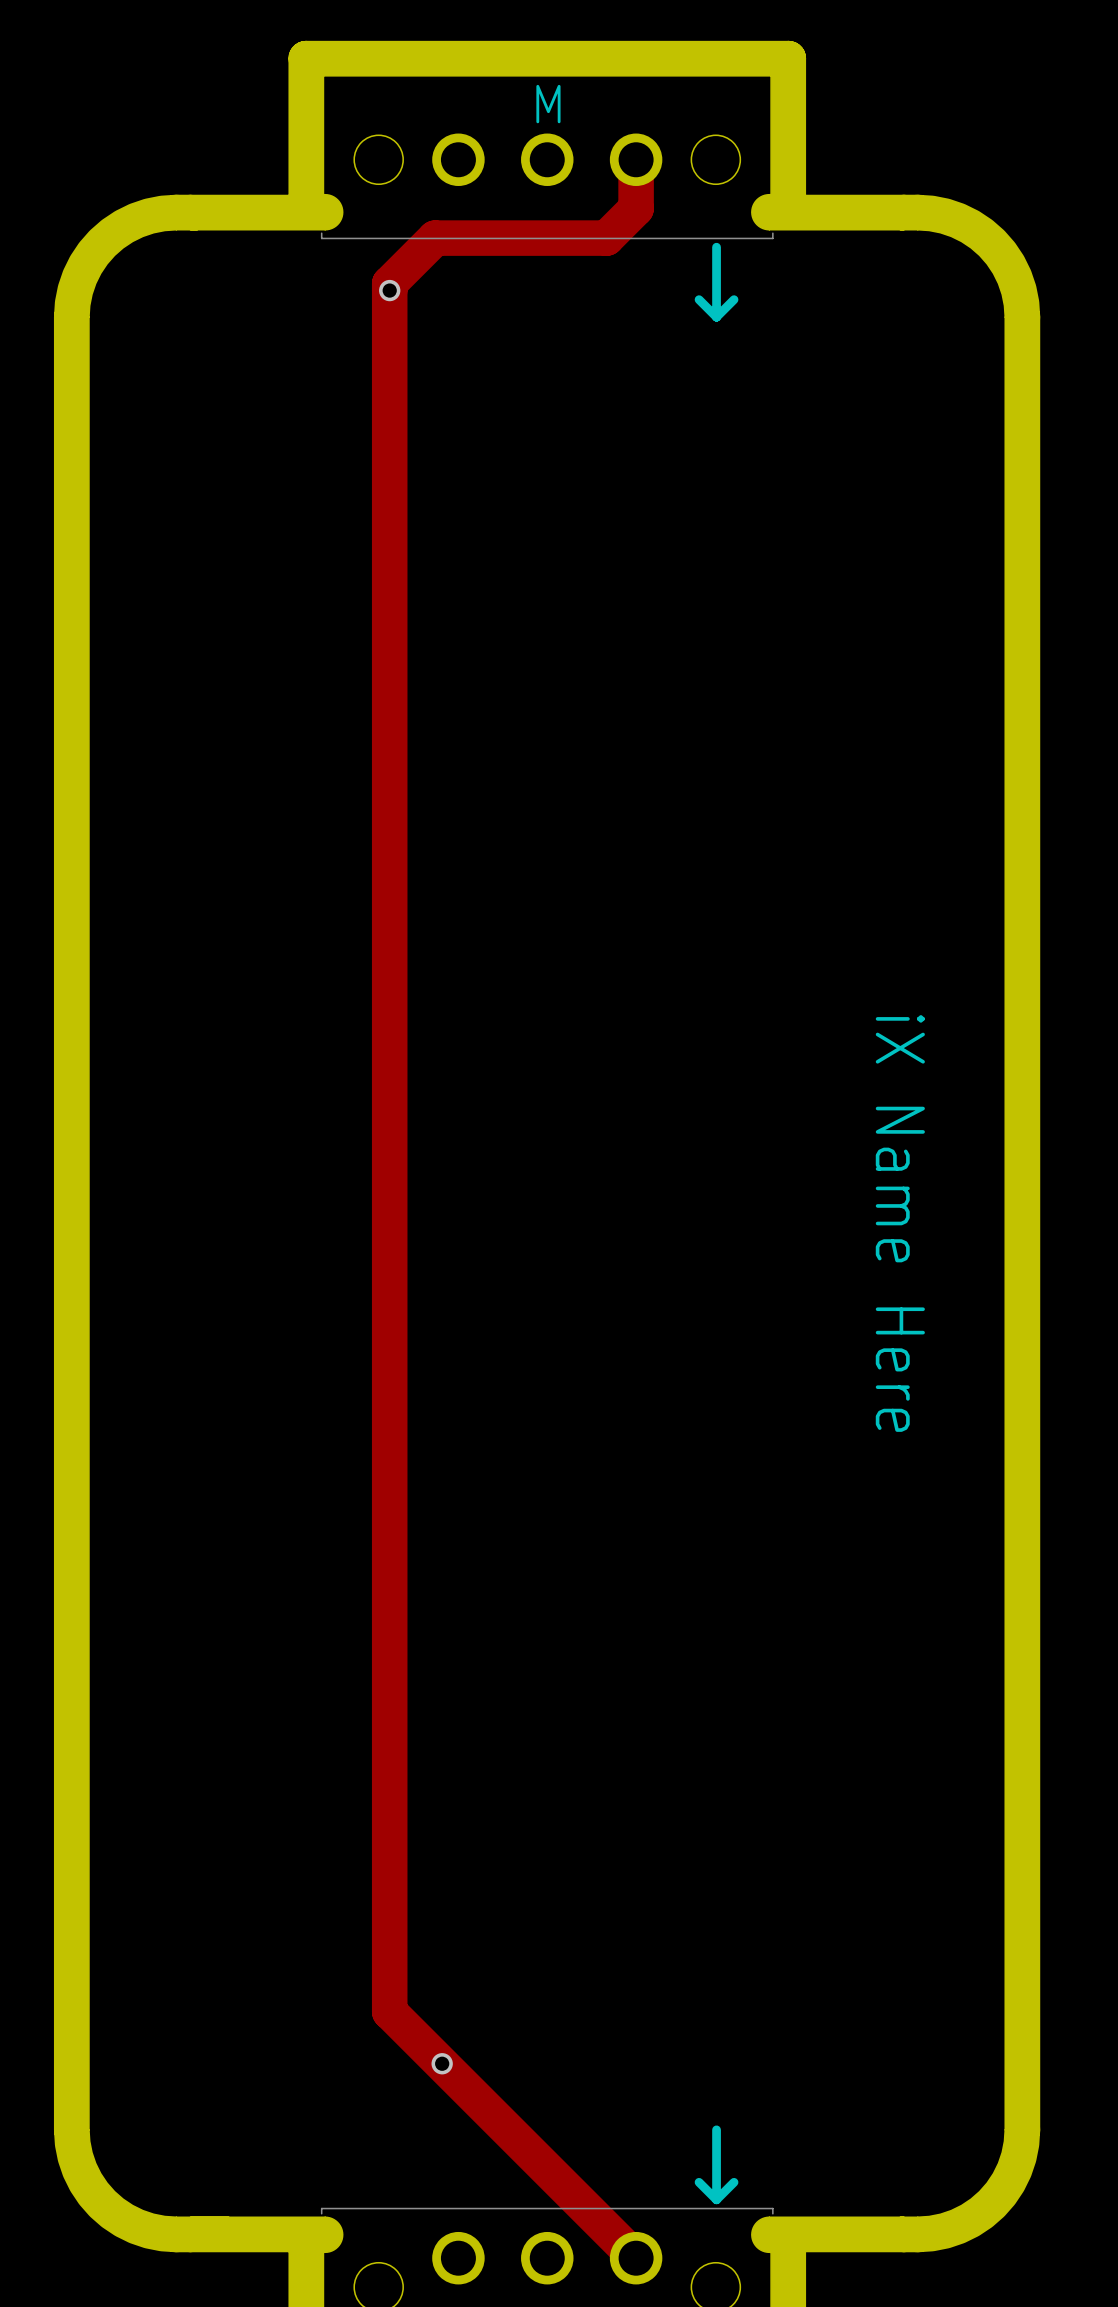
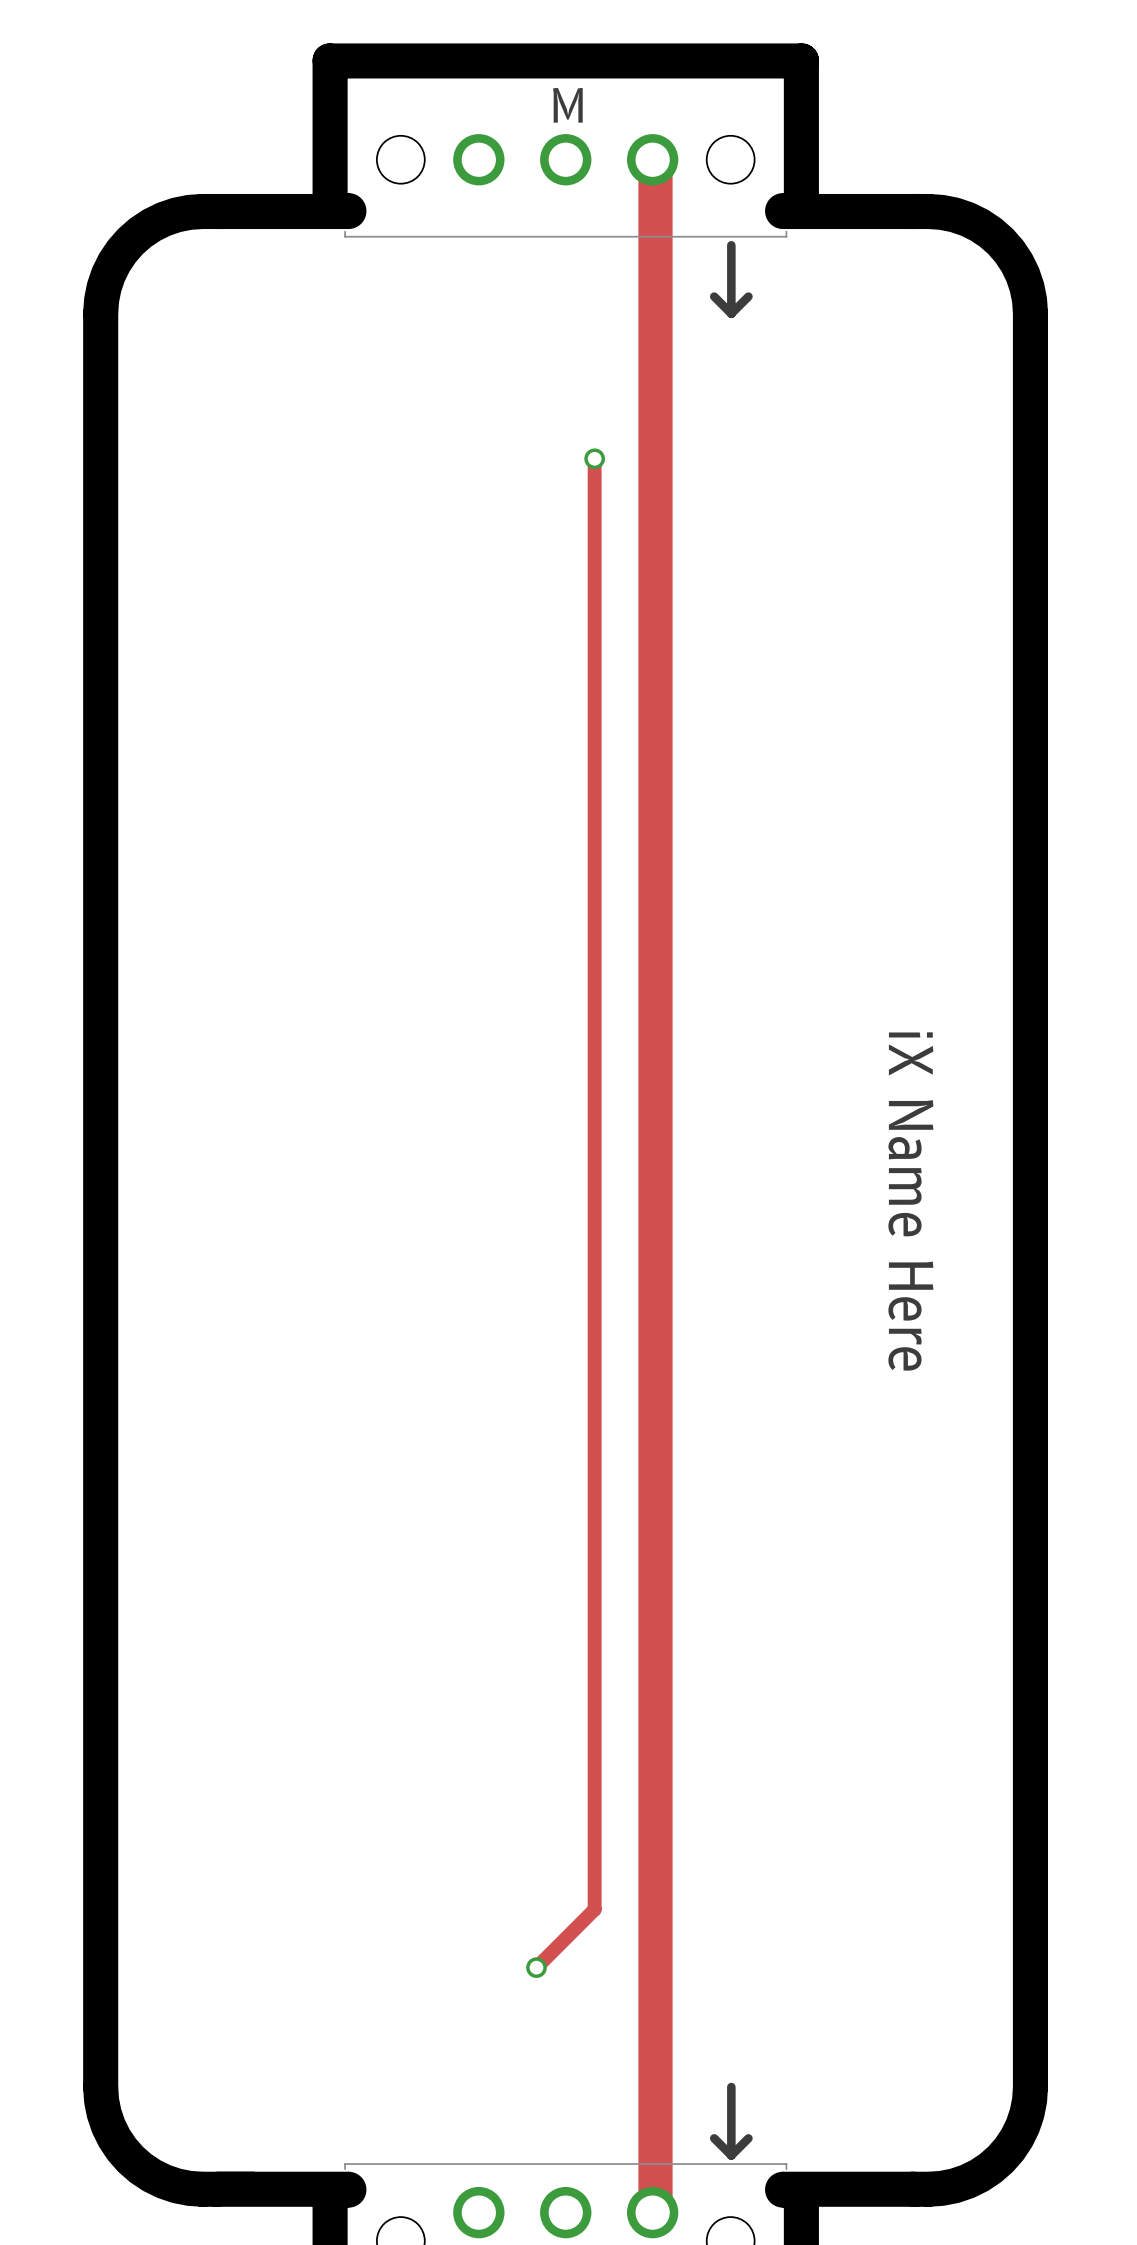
track: (636, 159) (636, 208) (606, 238) (435, 238) (389, 283) (389, 2011) (636, 2258) -> (655, 162) (655, 2209) (652, 2212)
via: (389, 290) -> none
track: none -> (594, 458) (594, 1909) (536, 1967)
via: none -> (594, 458)
via position: (442, 2063) -> (536, 1967)

